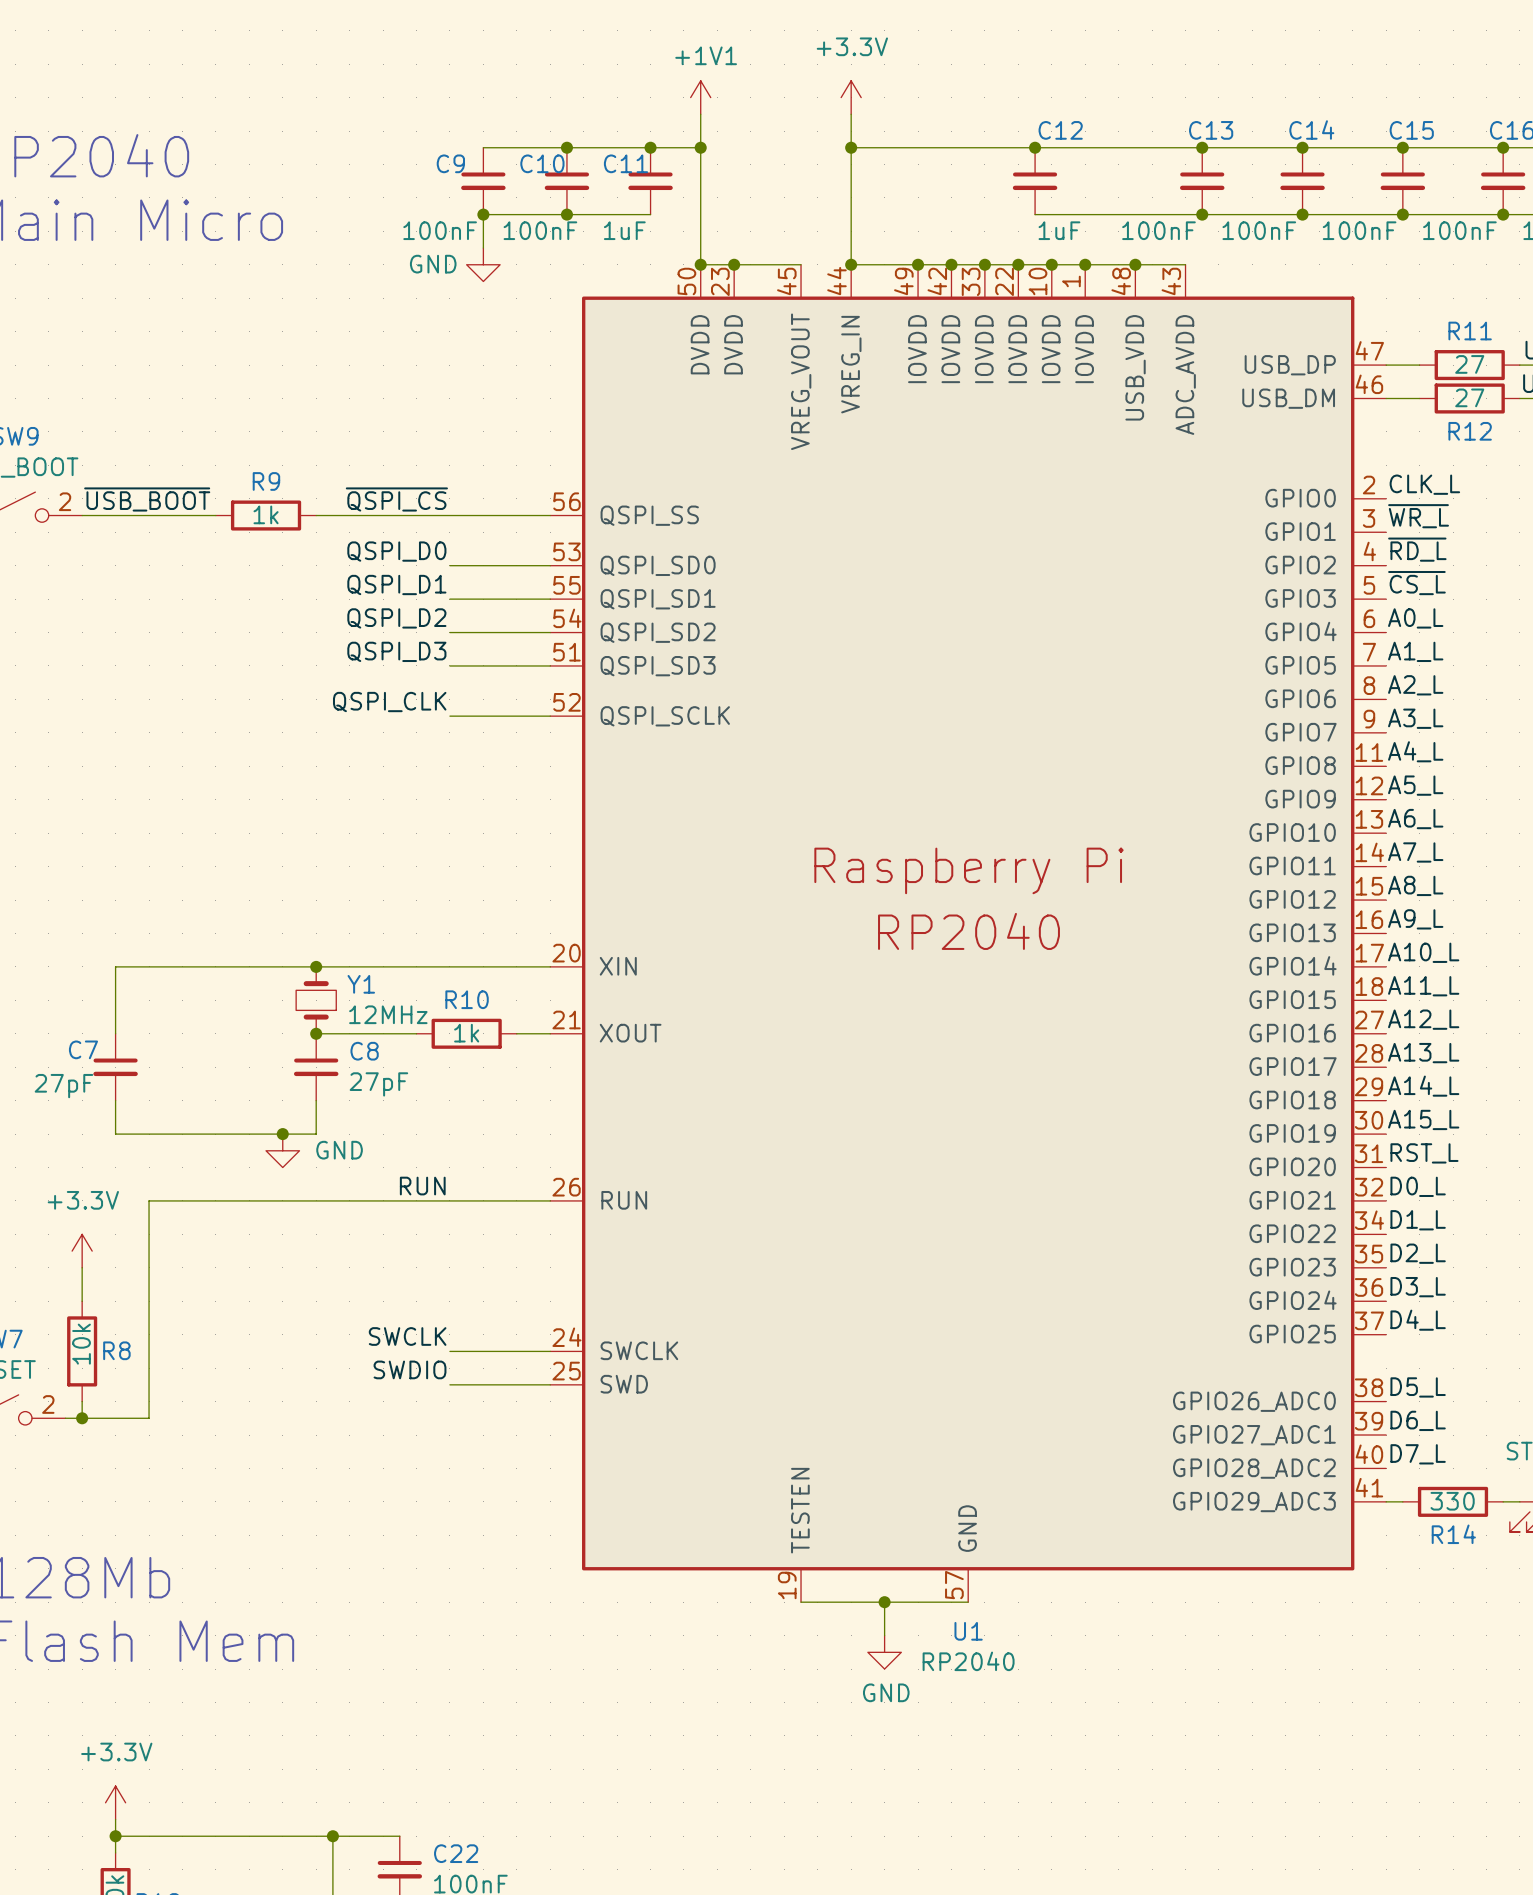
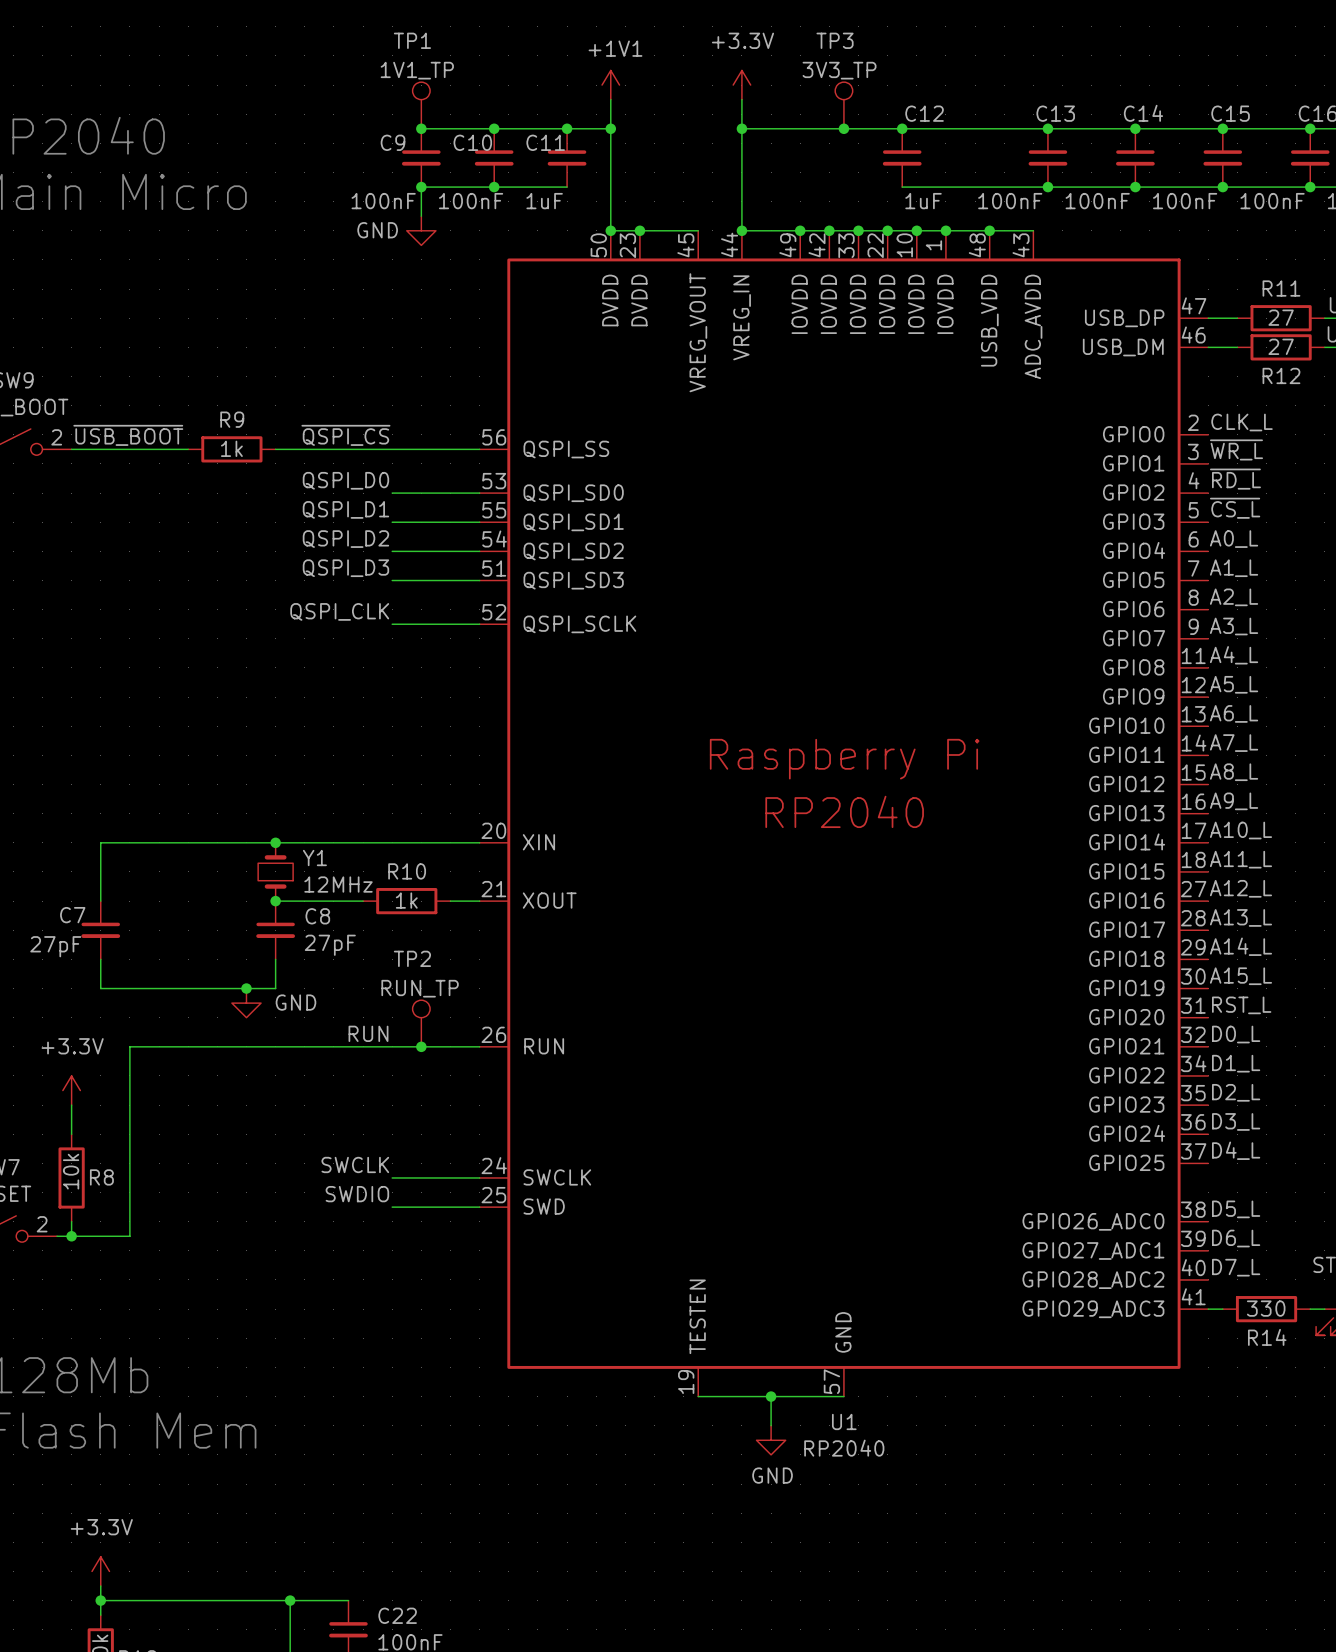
TP1: none -> 1V1_TP (421, 105)
TP3: none -> 3V3_TP (843, 105)
junction: none -> (421, 128)
junction: none -> (843, 128)
TP2: none -> RUN_TP (421, 1023)
junction: none -> (421, 1046)

